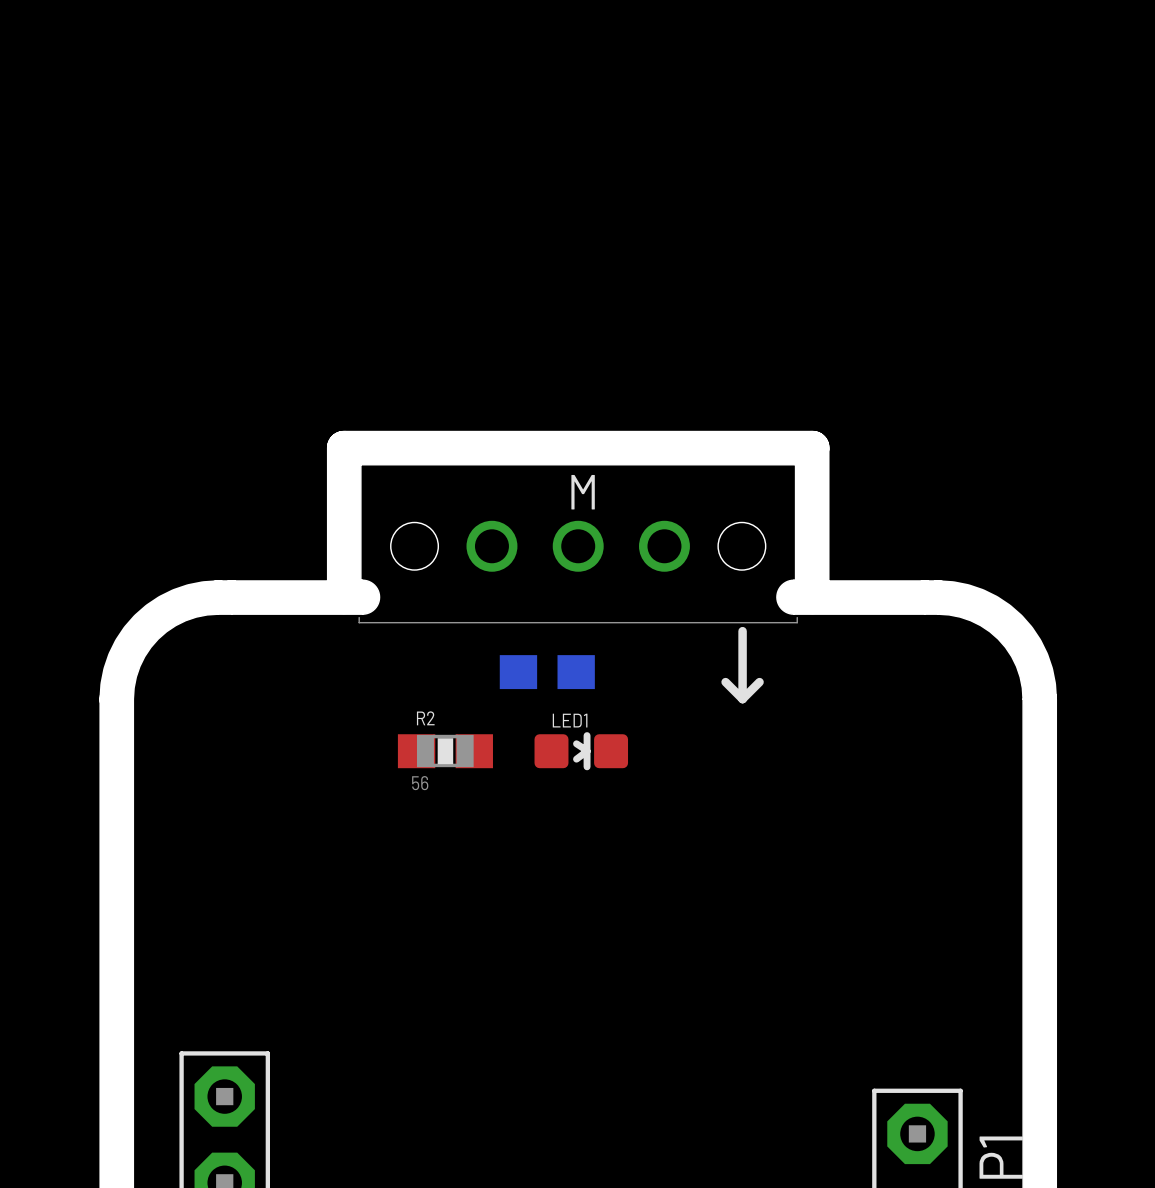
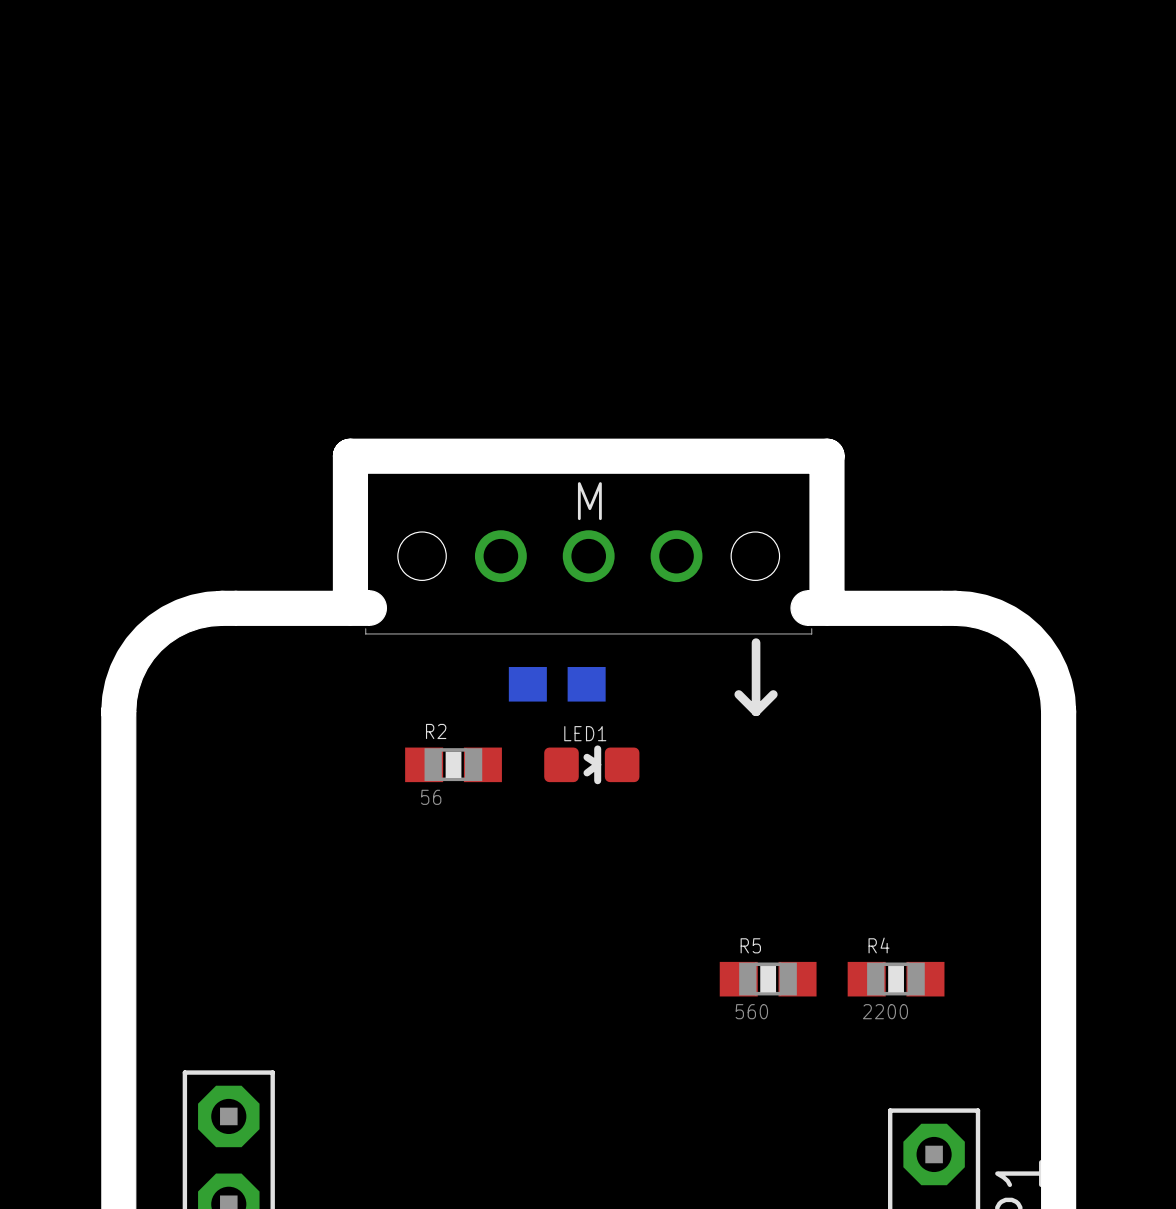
R5: none -> 560 (768, 979)
R4: none -> 2200 (896, 979)

